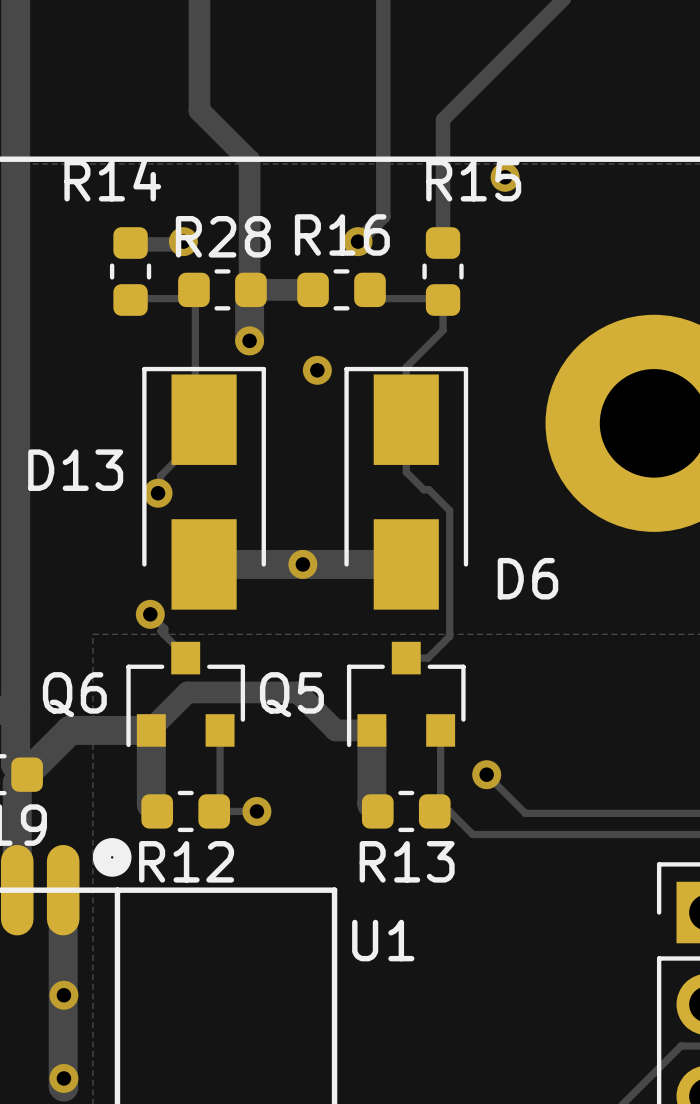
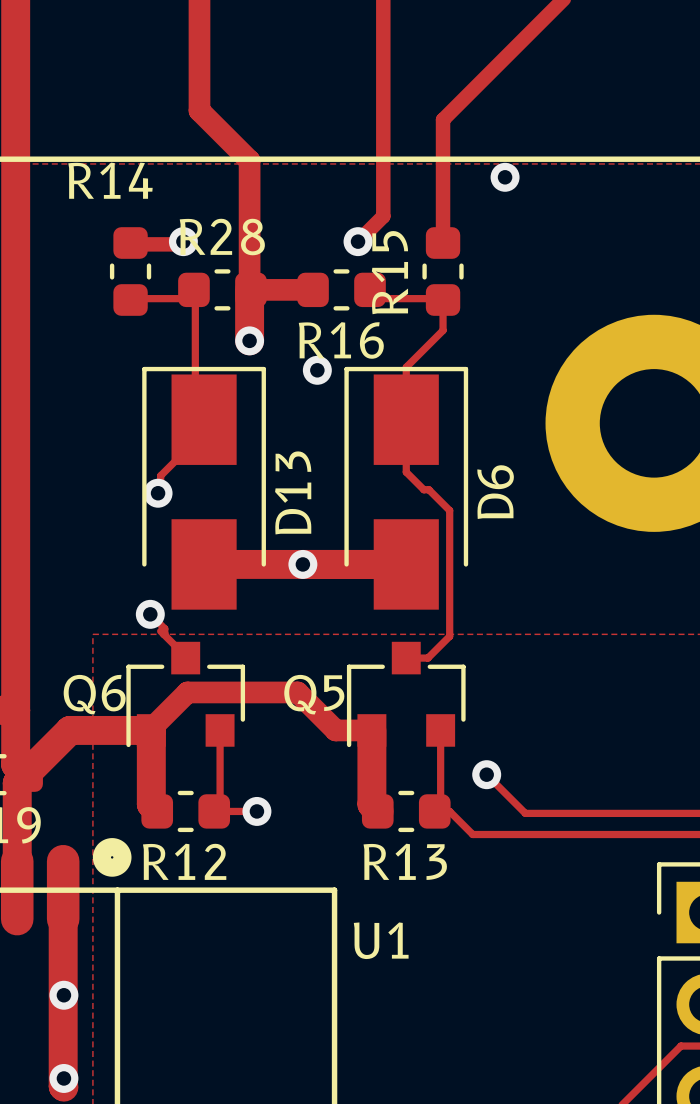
R15 name rotation: 0° (473, 180) -> 90° counterclockwise (389, 272)
R16 name position: R16 (342, 234) -> R16 (341, 340)
D13 name rotation: 0° (75, 470) -> 90° counterclockwise (293, 492)
D13 name position: D13 (75, 470) -> D13 (293, 492)
D6 name rotation: 0° (527, 578) -> 90° counterclockwise (495, 492)
D6 name position: D6 (527, 578) -> D6 (495, 492)
Q6 name position: Q6 (74, 694) -> Q6 (94, 694)
Q5 name position: Q5 (291, 694) -> Q5 (314, 694)

